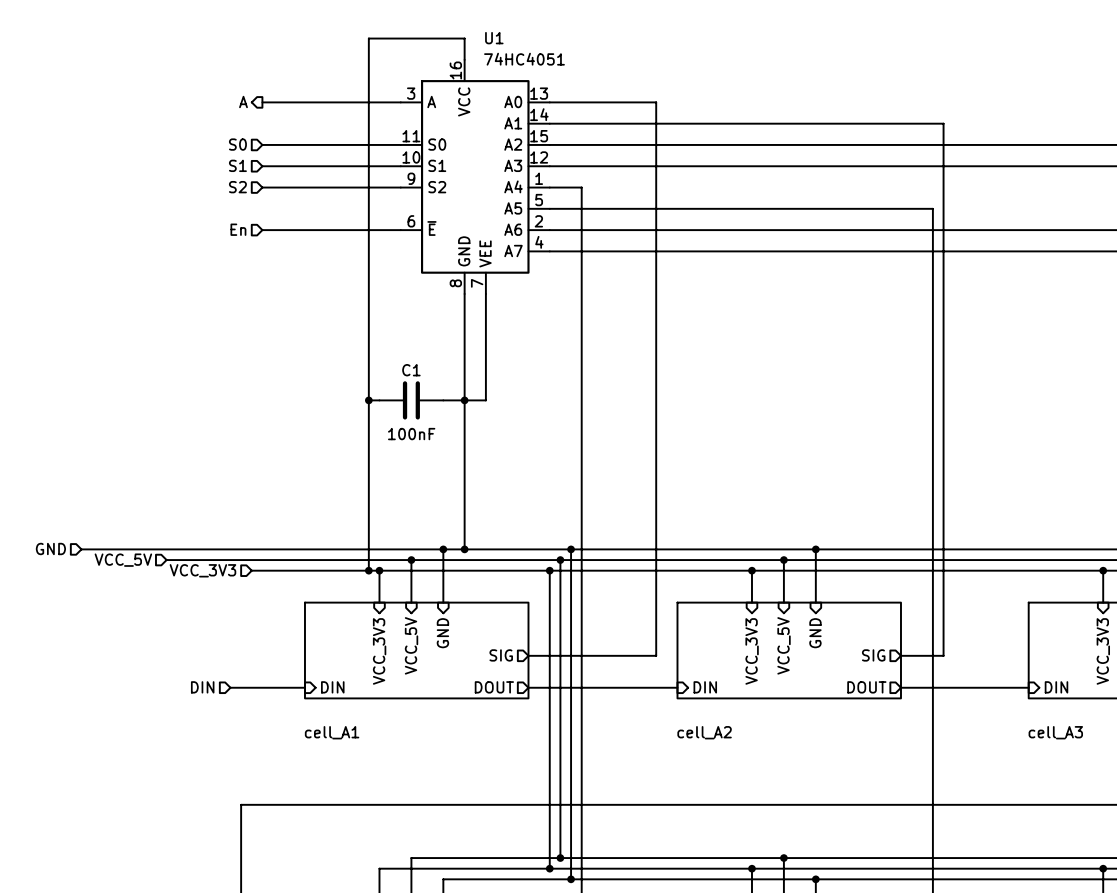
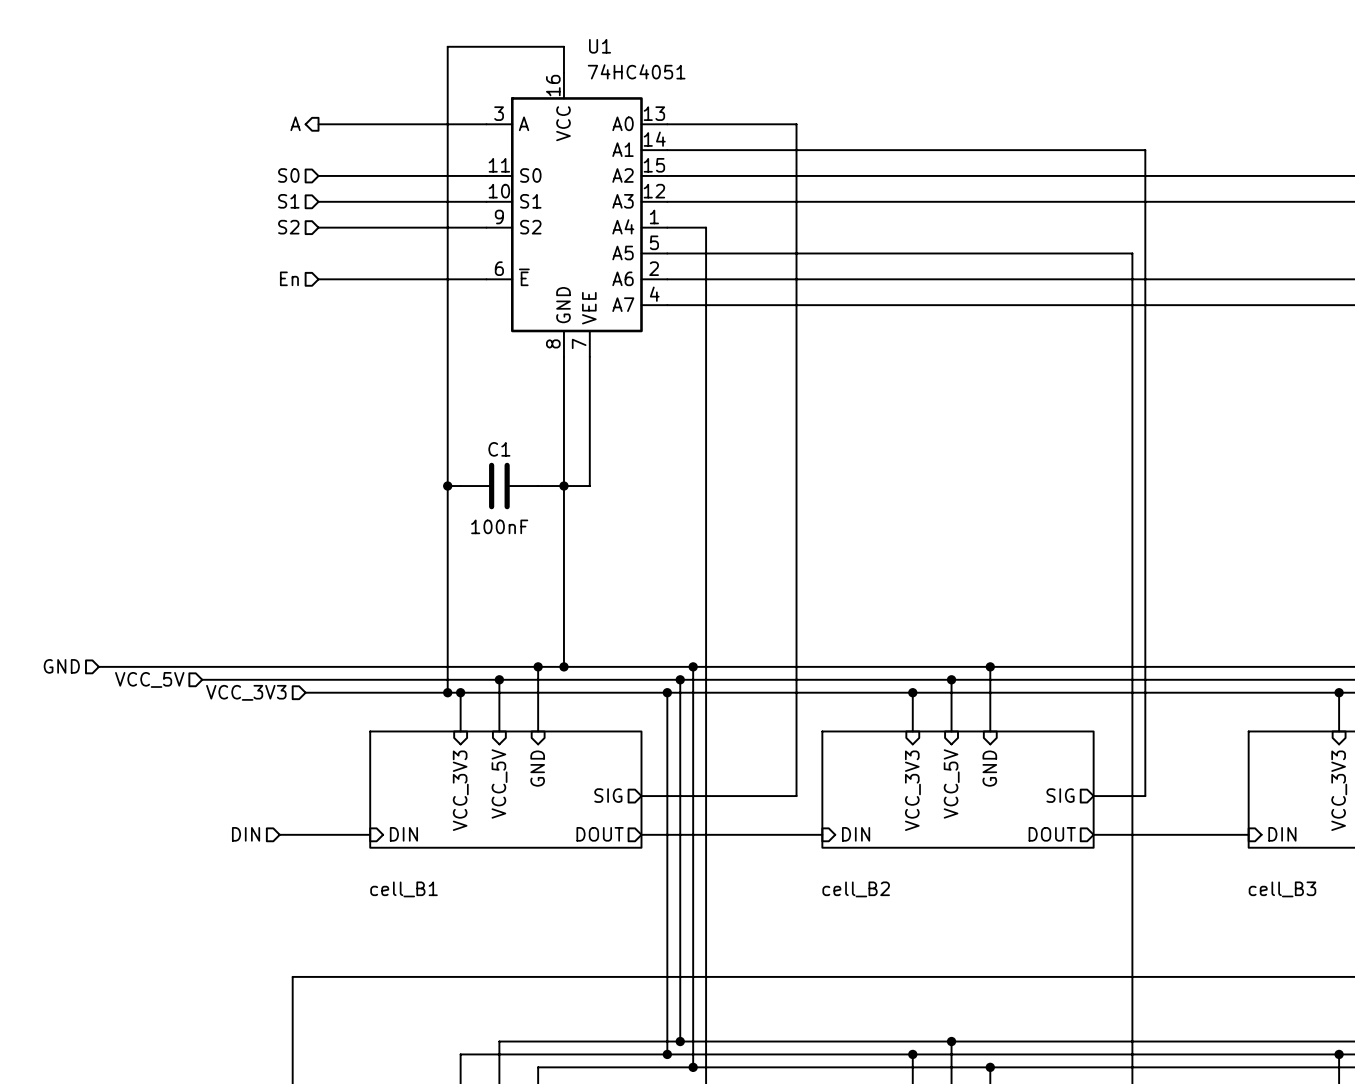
sheet cell_A1 name: cell_A1 (332, 732) -> cell_B1 (404, 889)
sheet cell_A2 name: cell_A2 (704, 732) -> cell_B2 (856, 889)
sheet cell_A3 name: cell_A3 (1055, 732) -> cell_B3 (1282, 889)

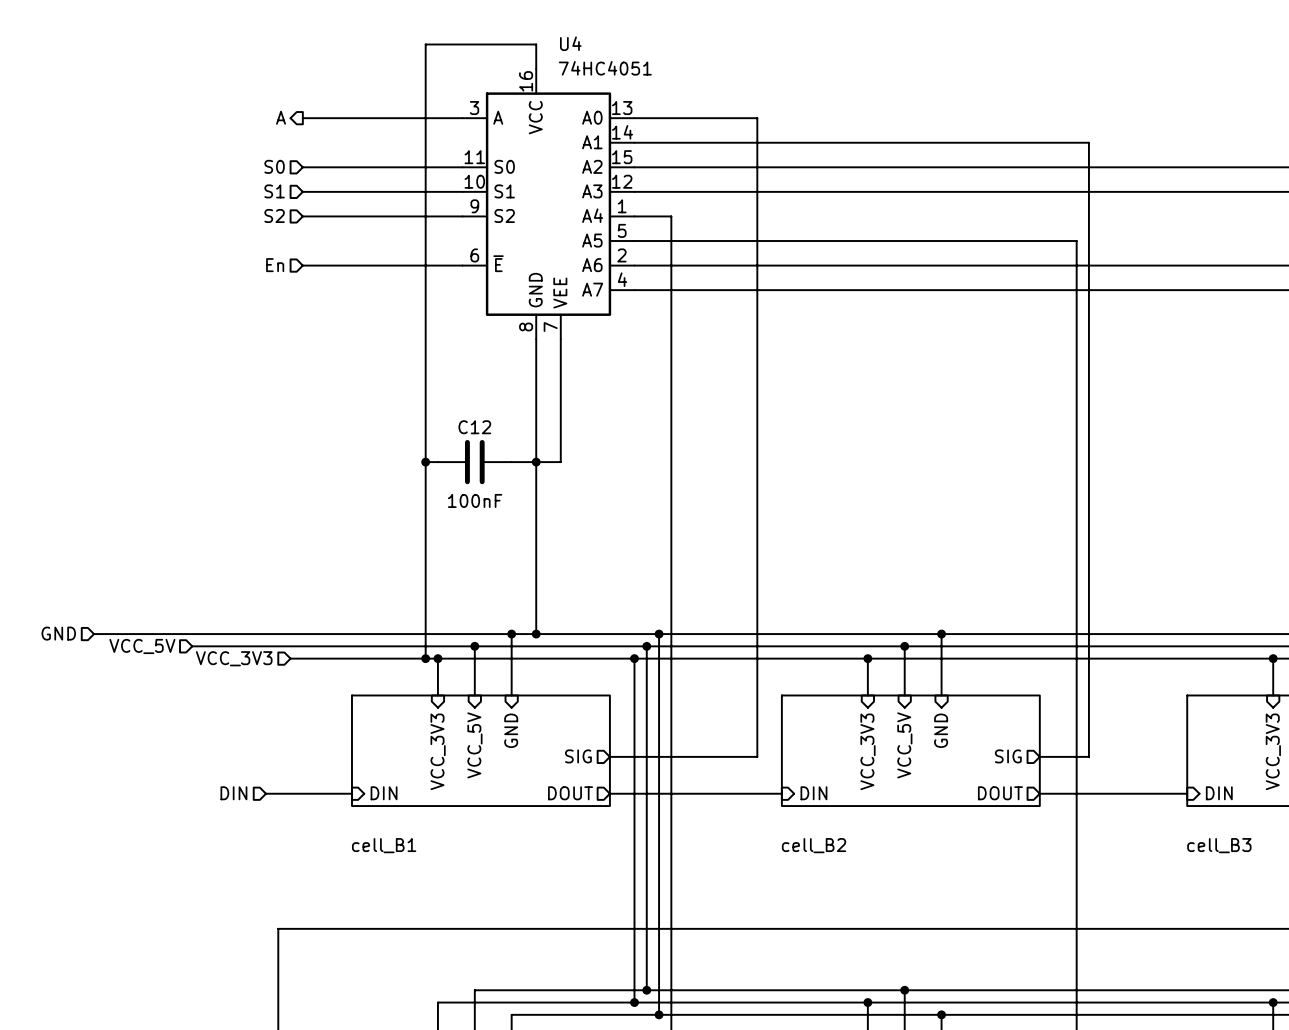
U1 name: U1 (600, 46) -> U4 (570, 43)
C1 name: C1 (499, 449) -> C12 (474, 427)

